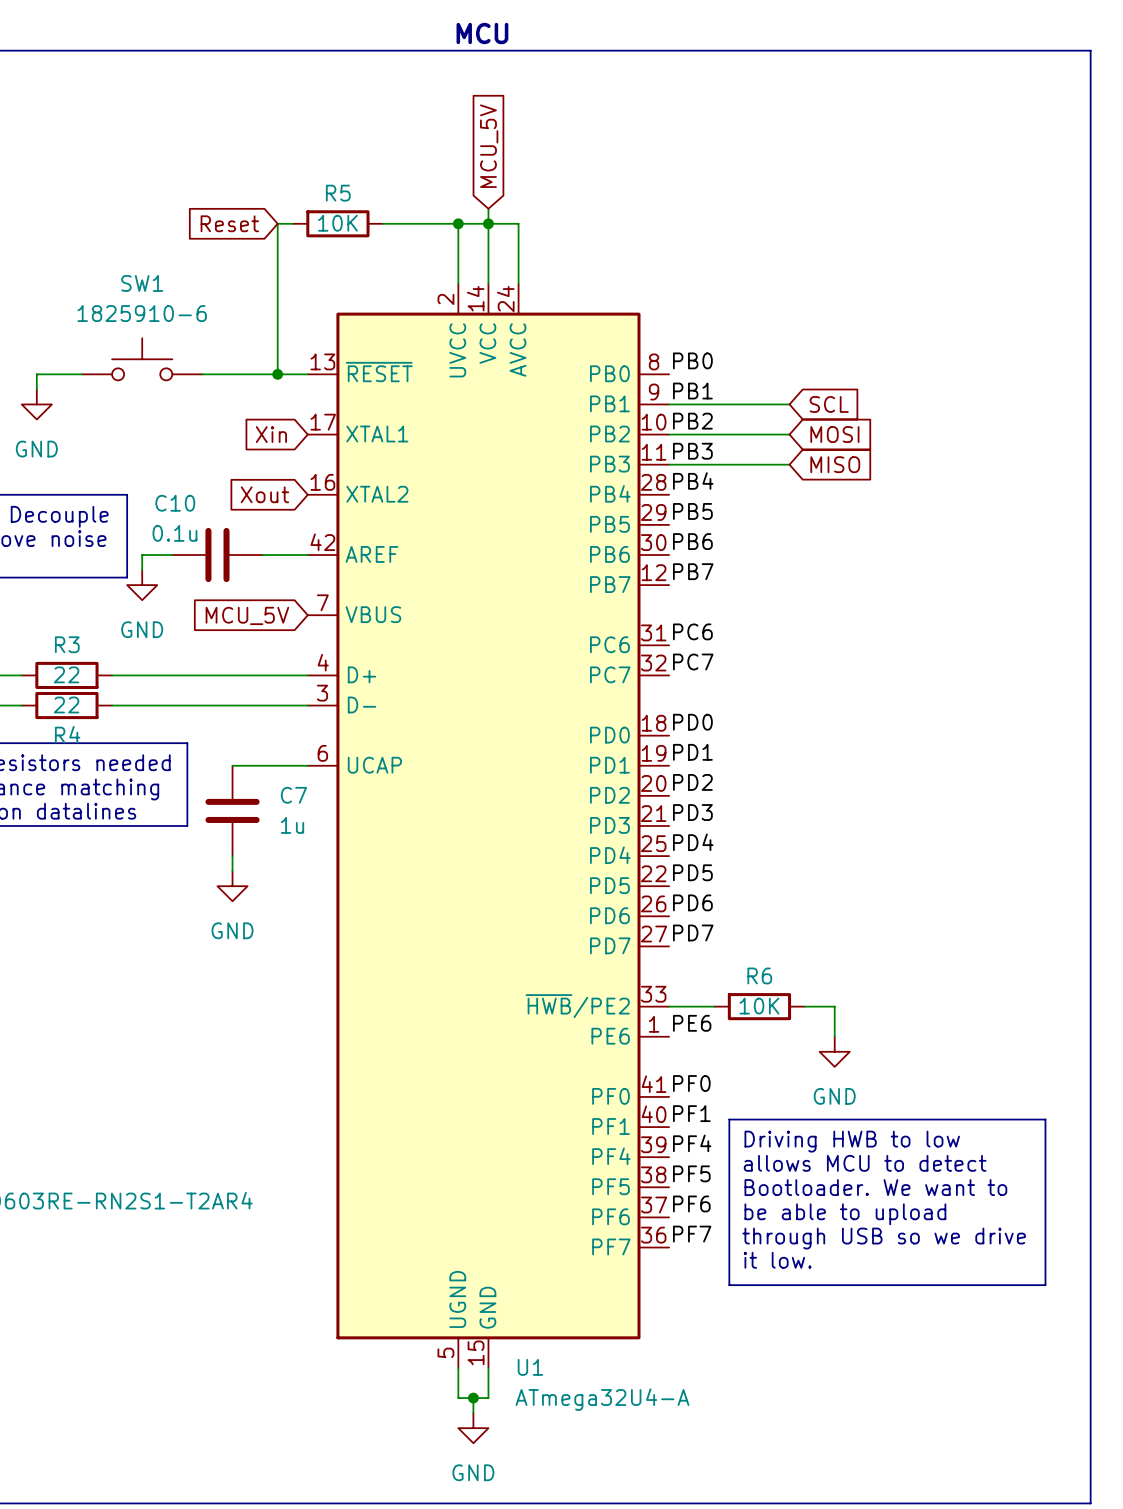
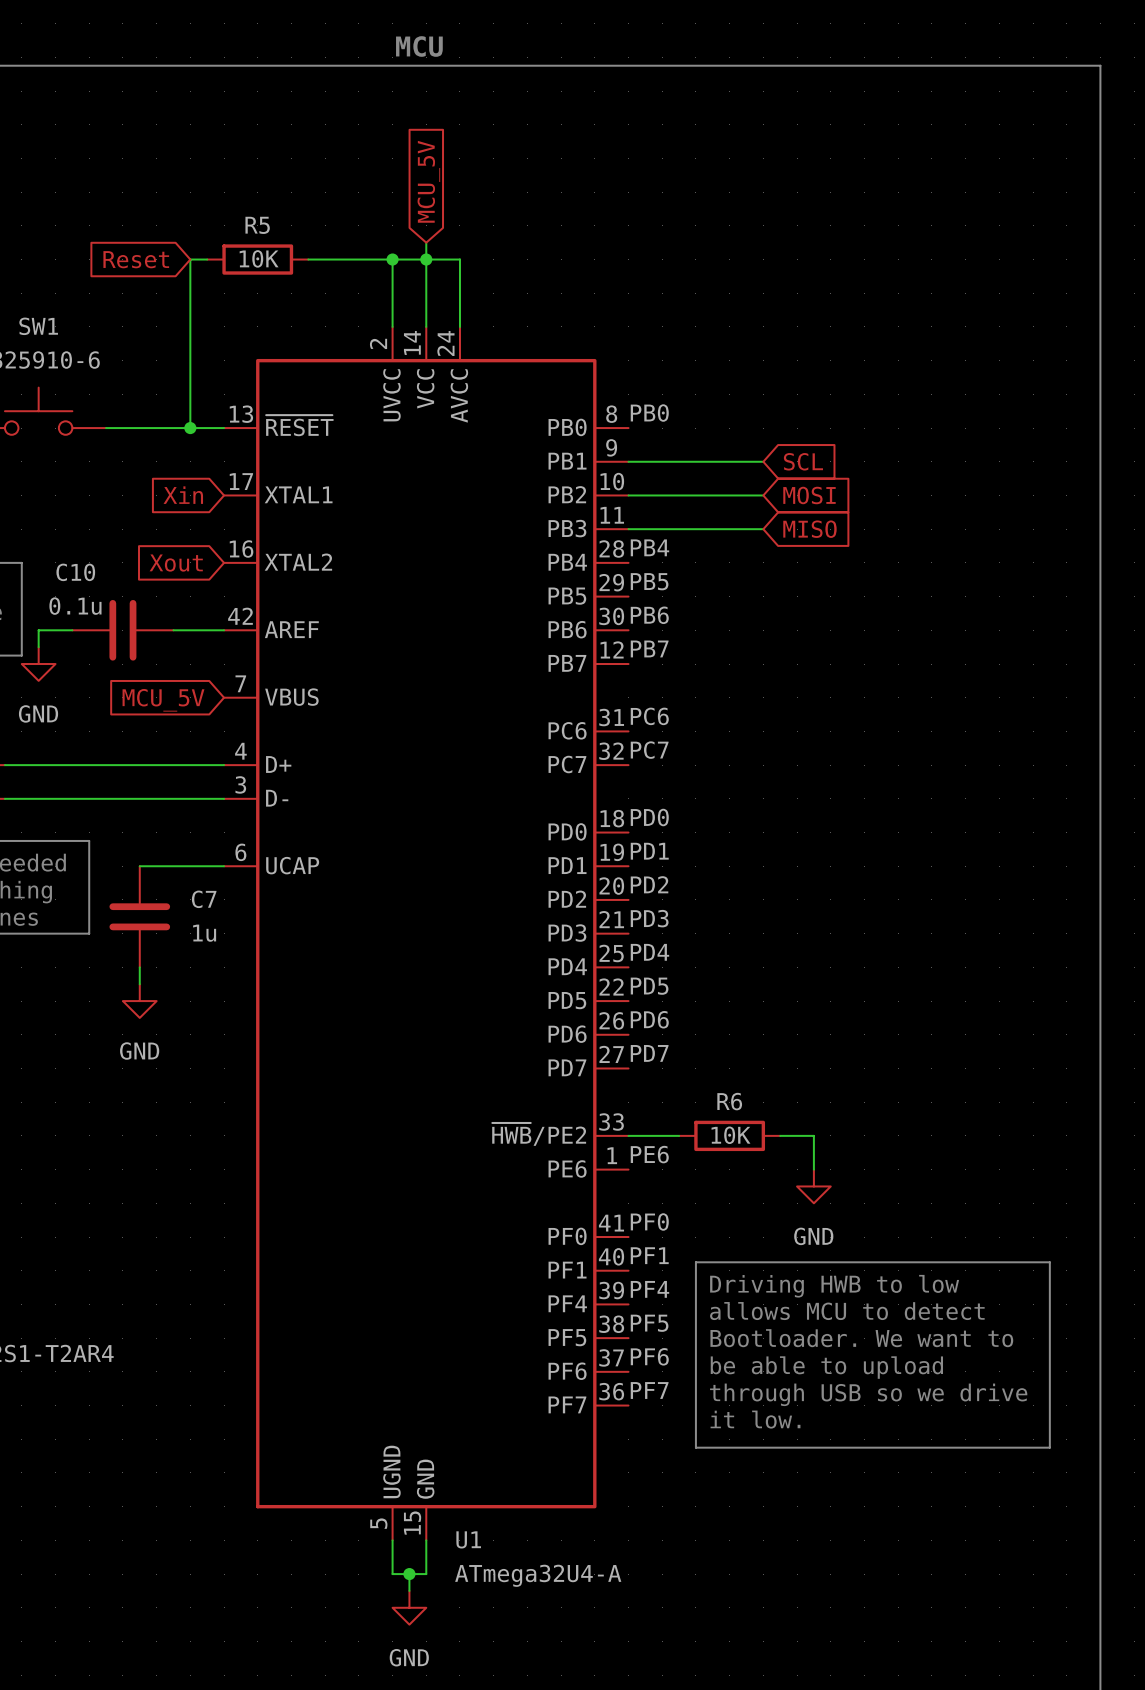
label: PB1 (692, 391) -> none
label: PB2 (692, 421) -> none
label: PB3 (692, 451) -> none

